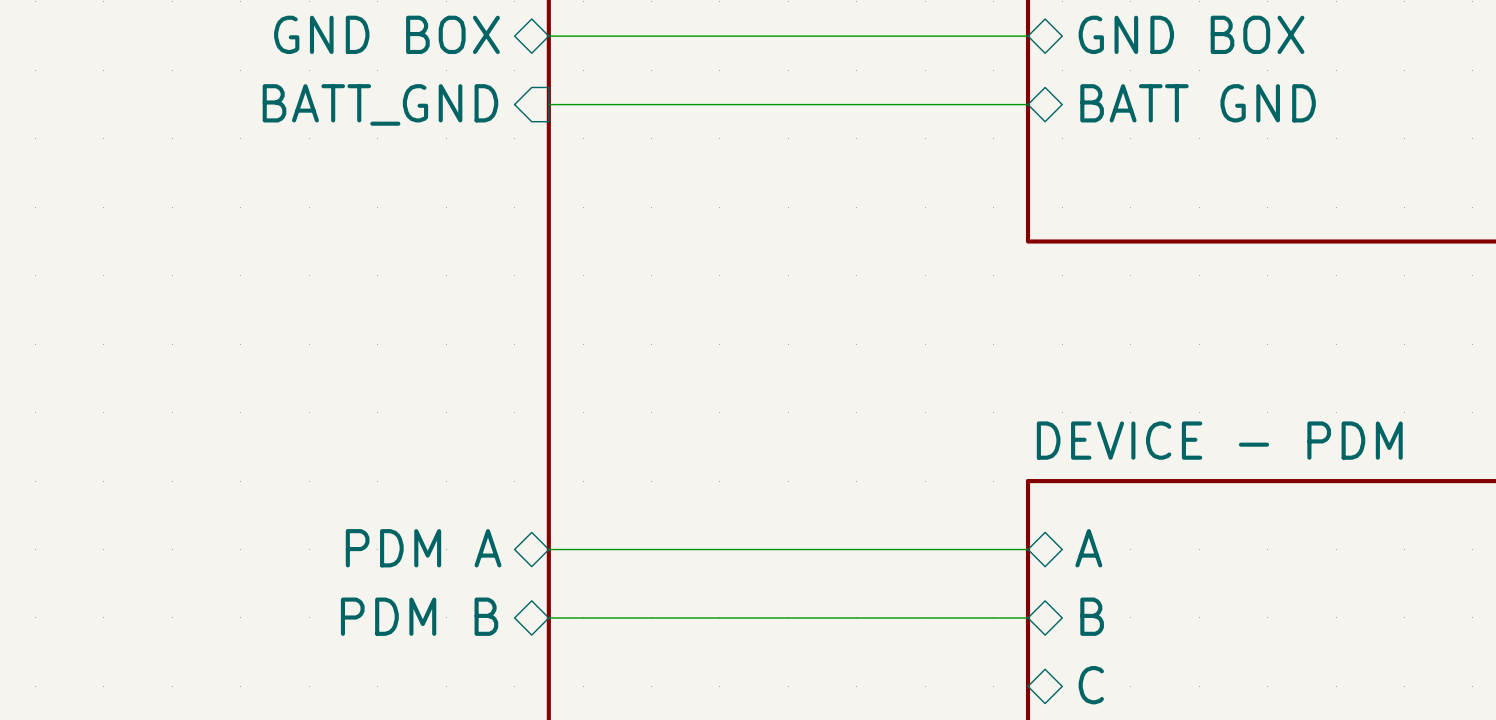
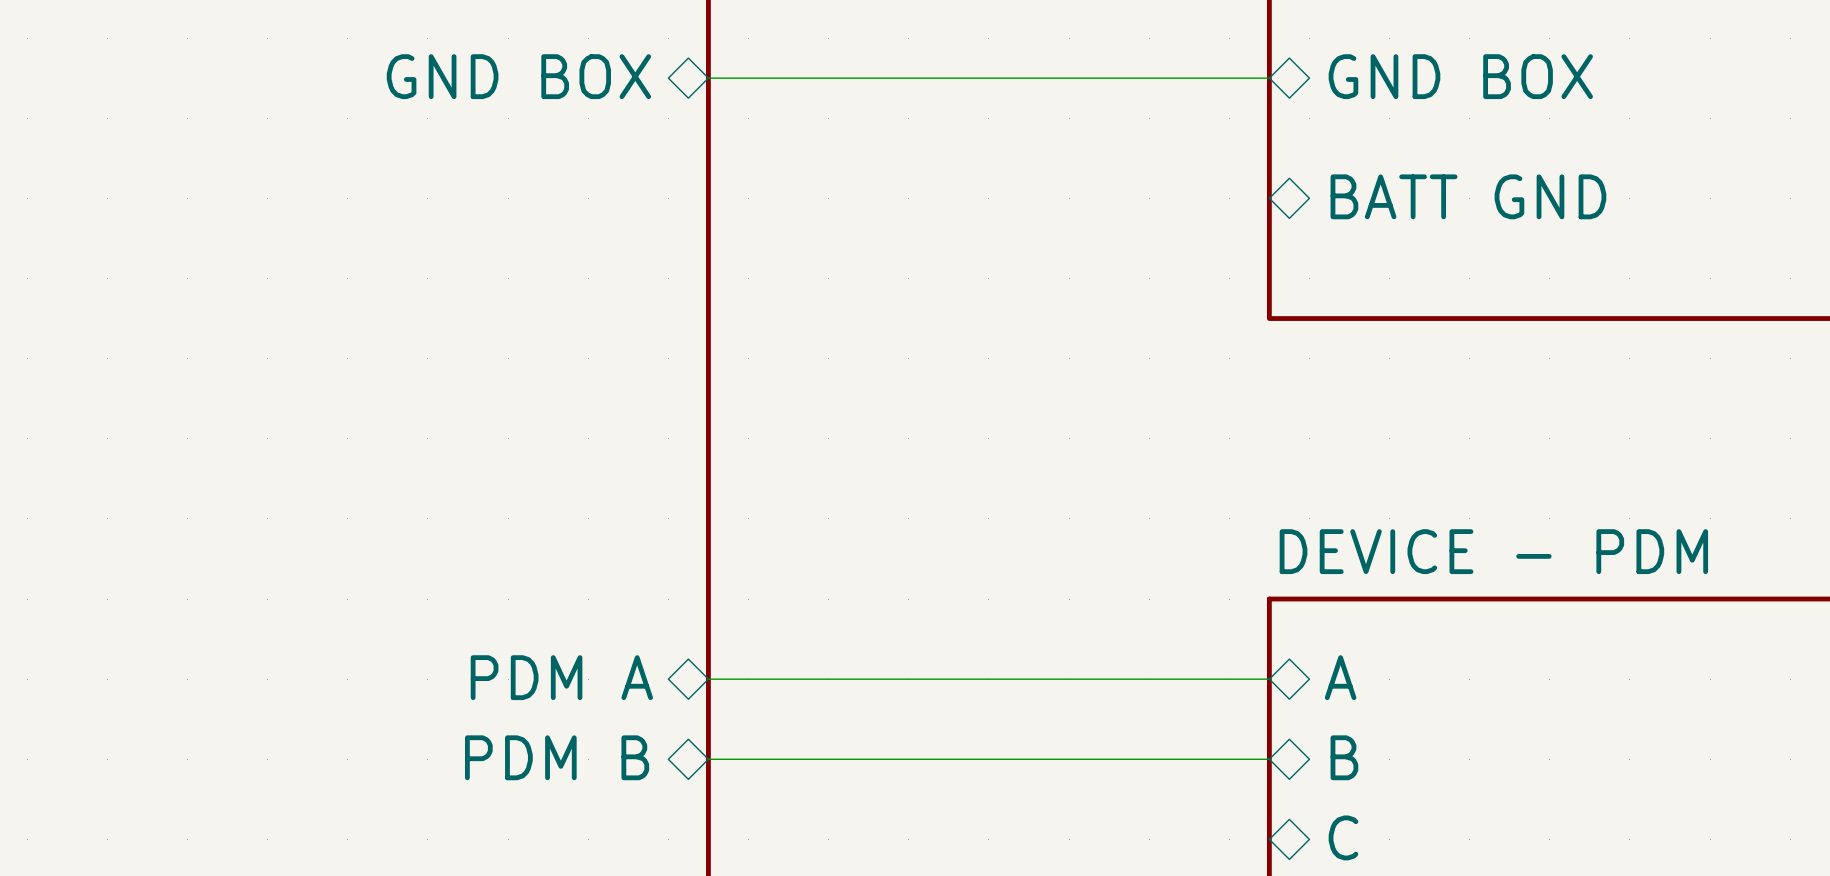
sheet pin position: BATT GND (1198, 103) -> BATT GND (1468, 196)
sheet pin: BATT_GND (380, 104) -> none
wire: (548, 104) (1028, 104) -> none

